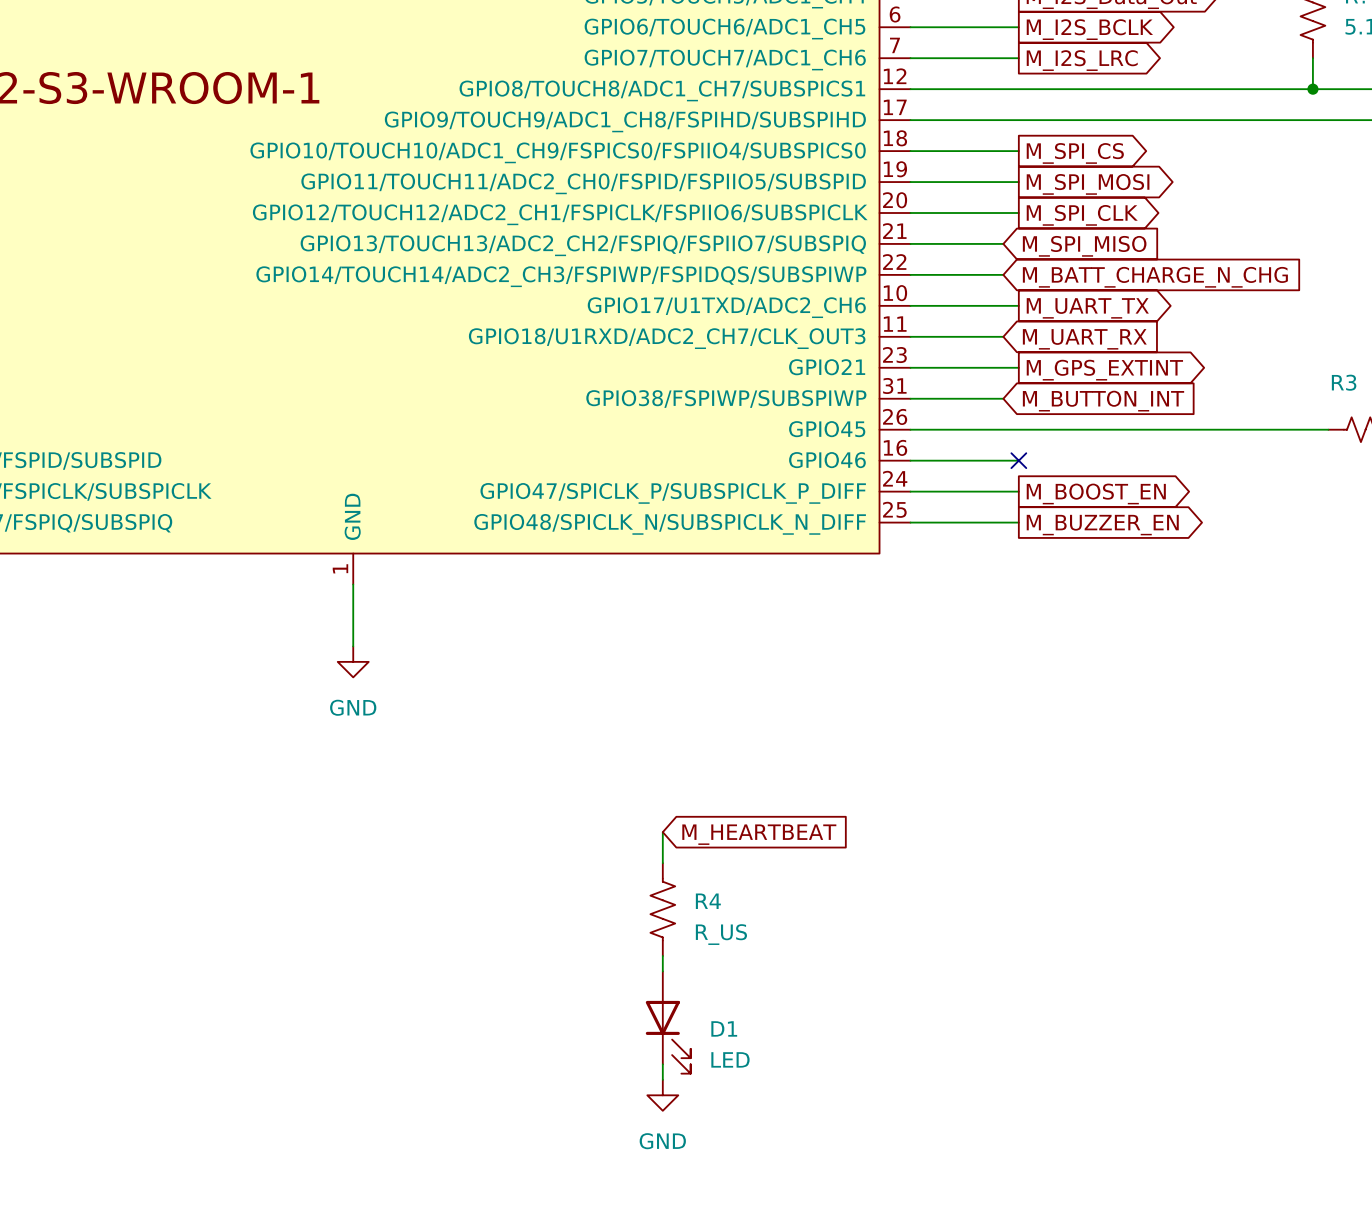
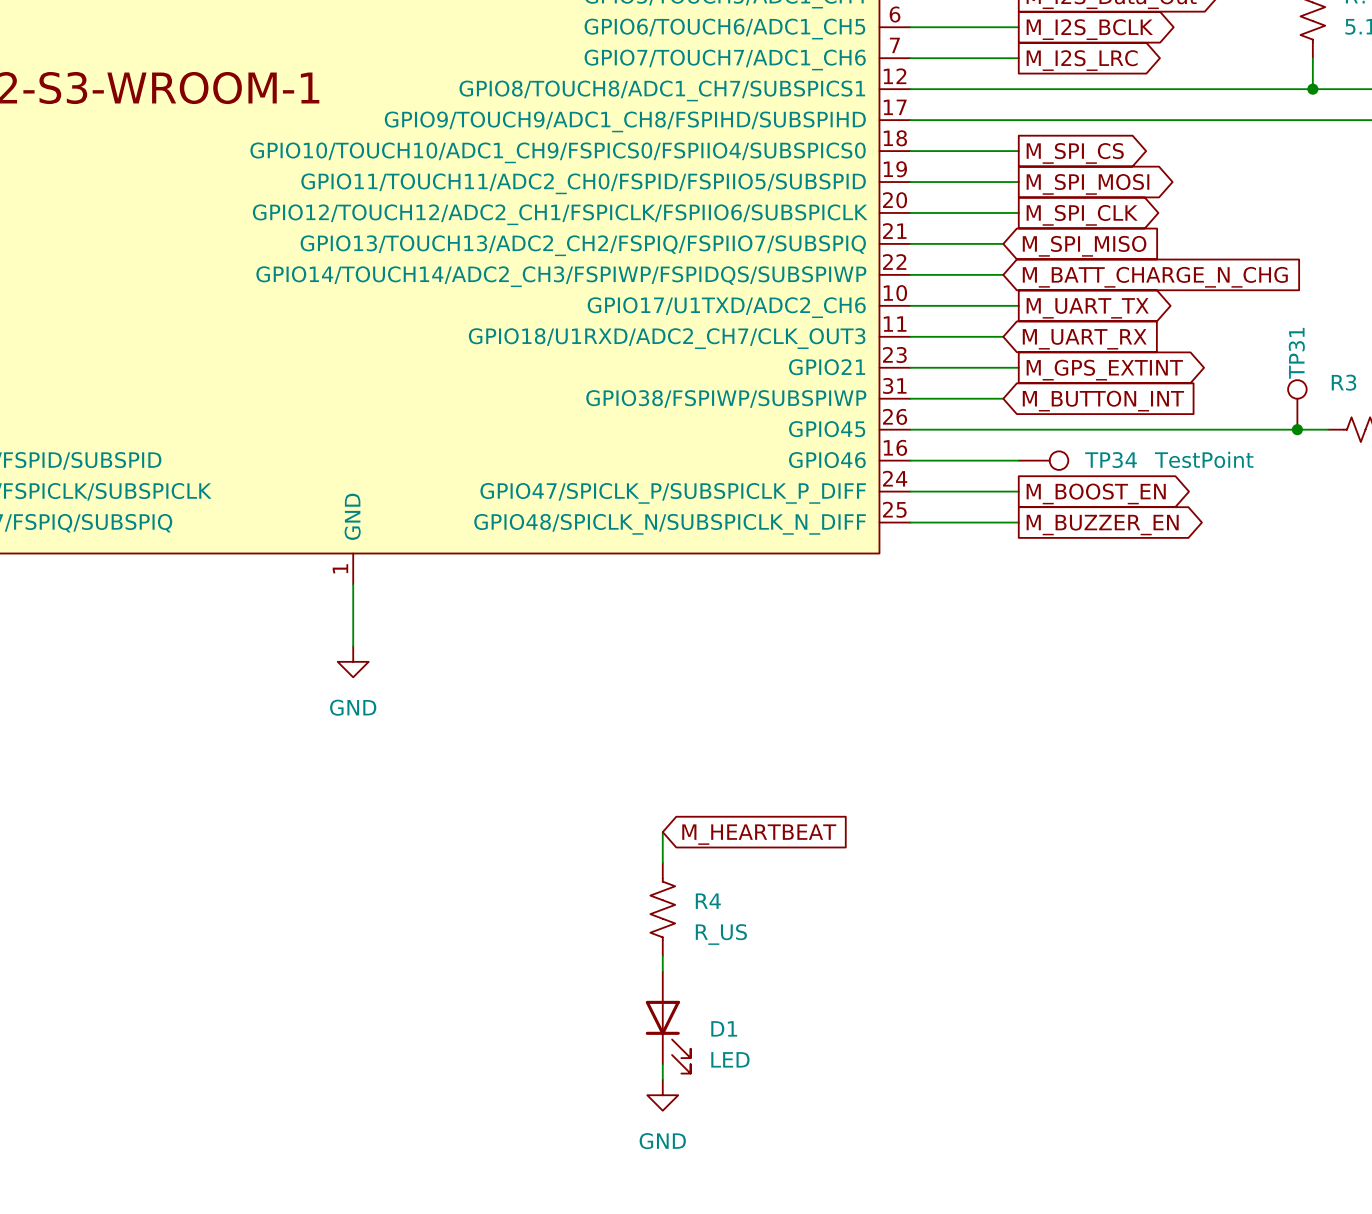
TP31: none -> (1297, 404)
junction: none -> (1297, 429)
no-connect mark: (1018, 460) -> none
TP34: none -> TestPoint (1043, 460)

